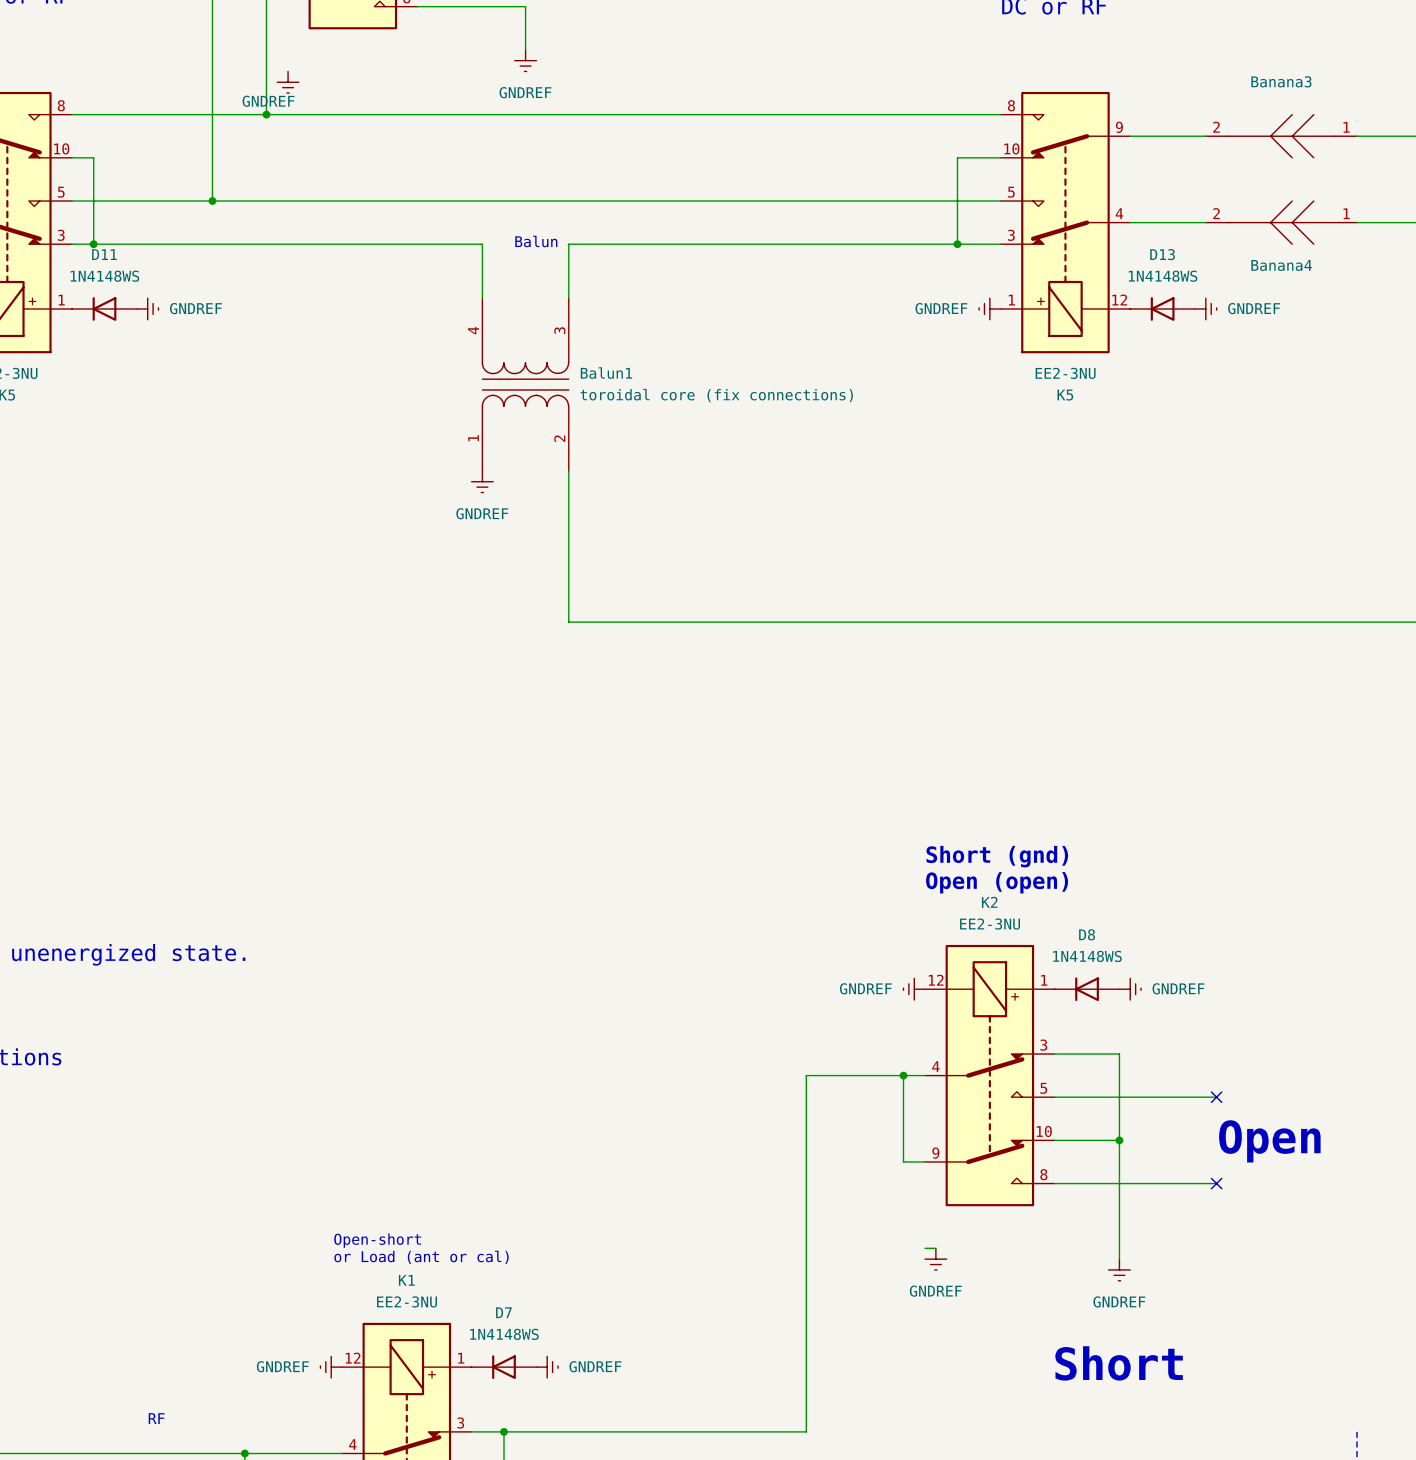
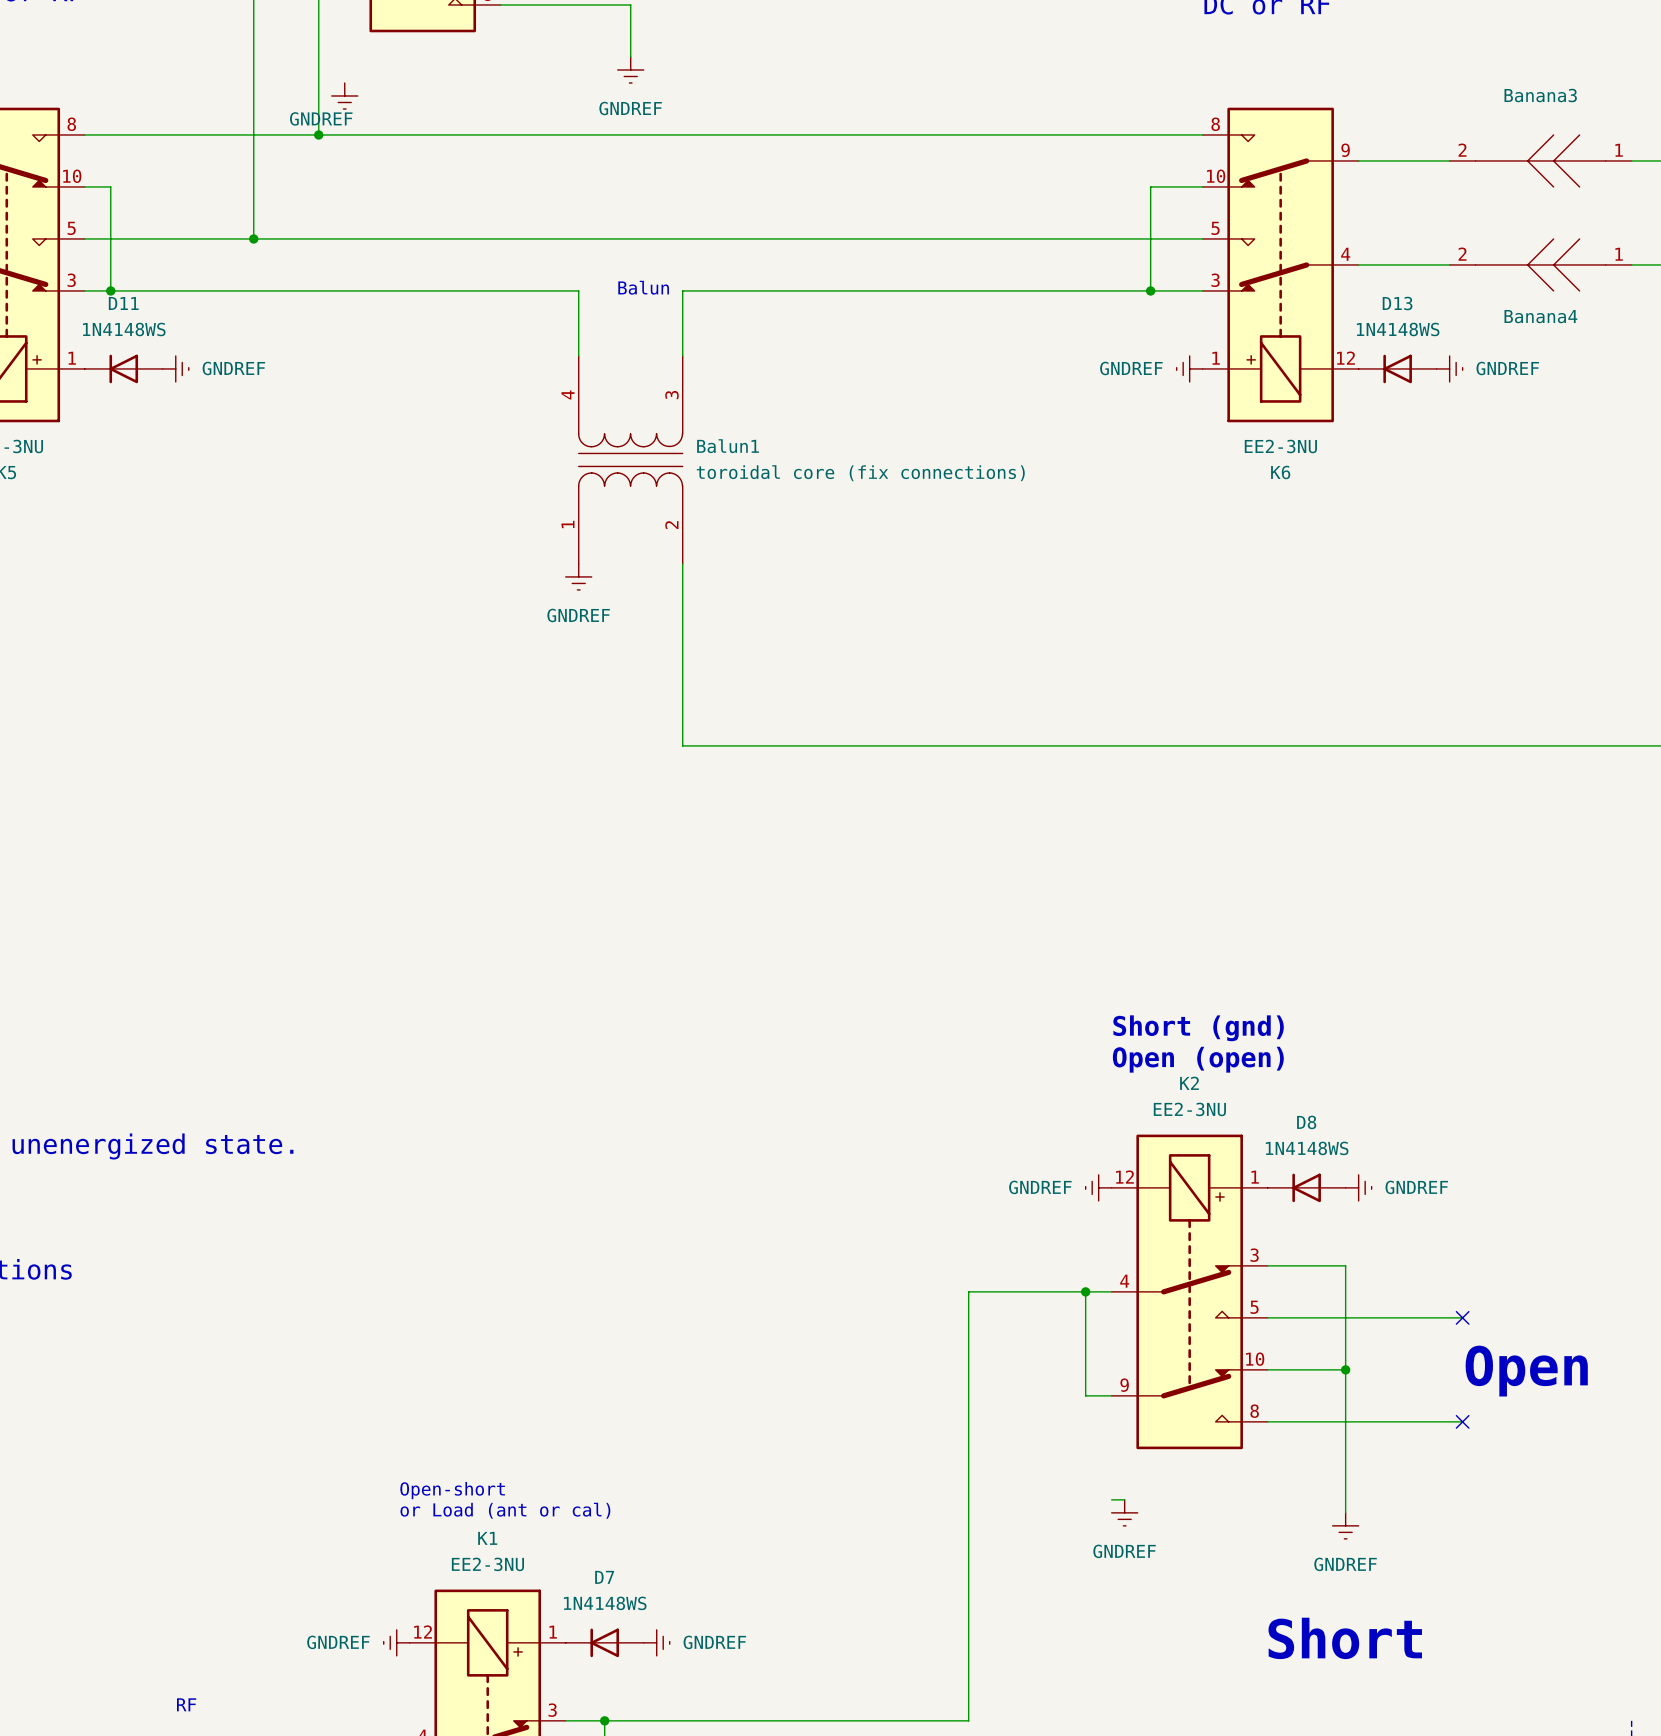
K5 name: K5 (1065, 395) -> K6 (1280, 472)

